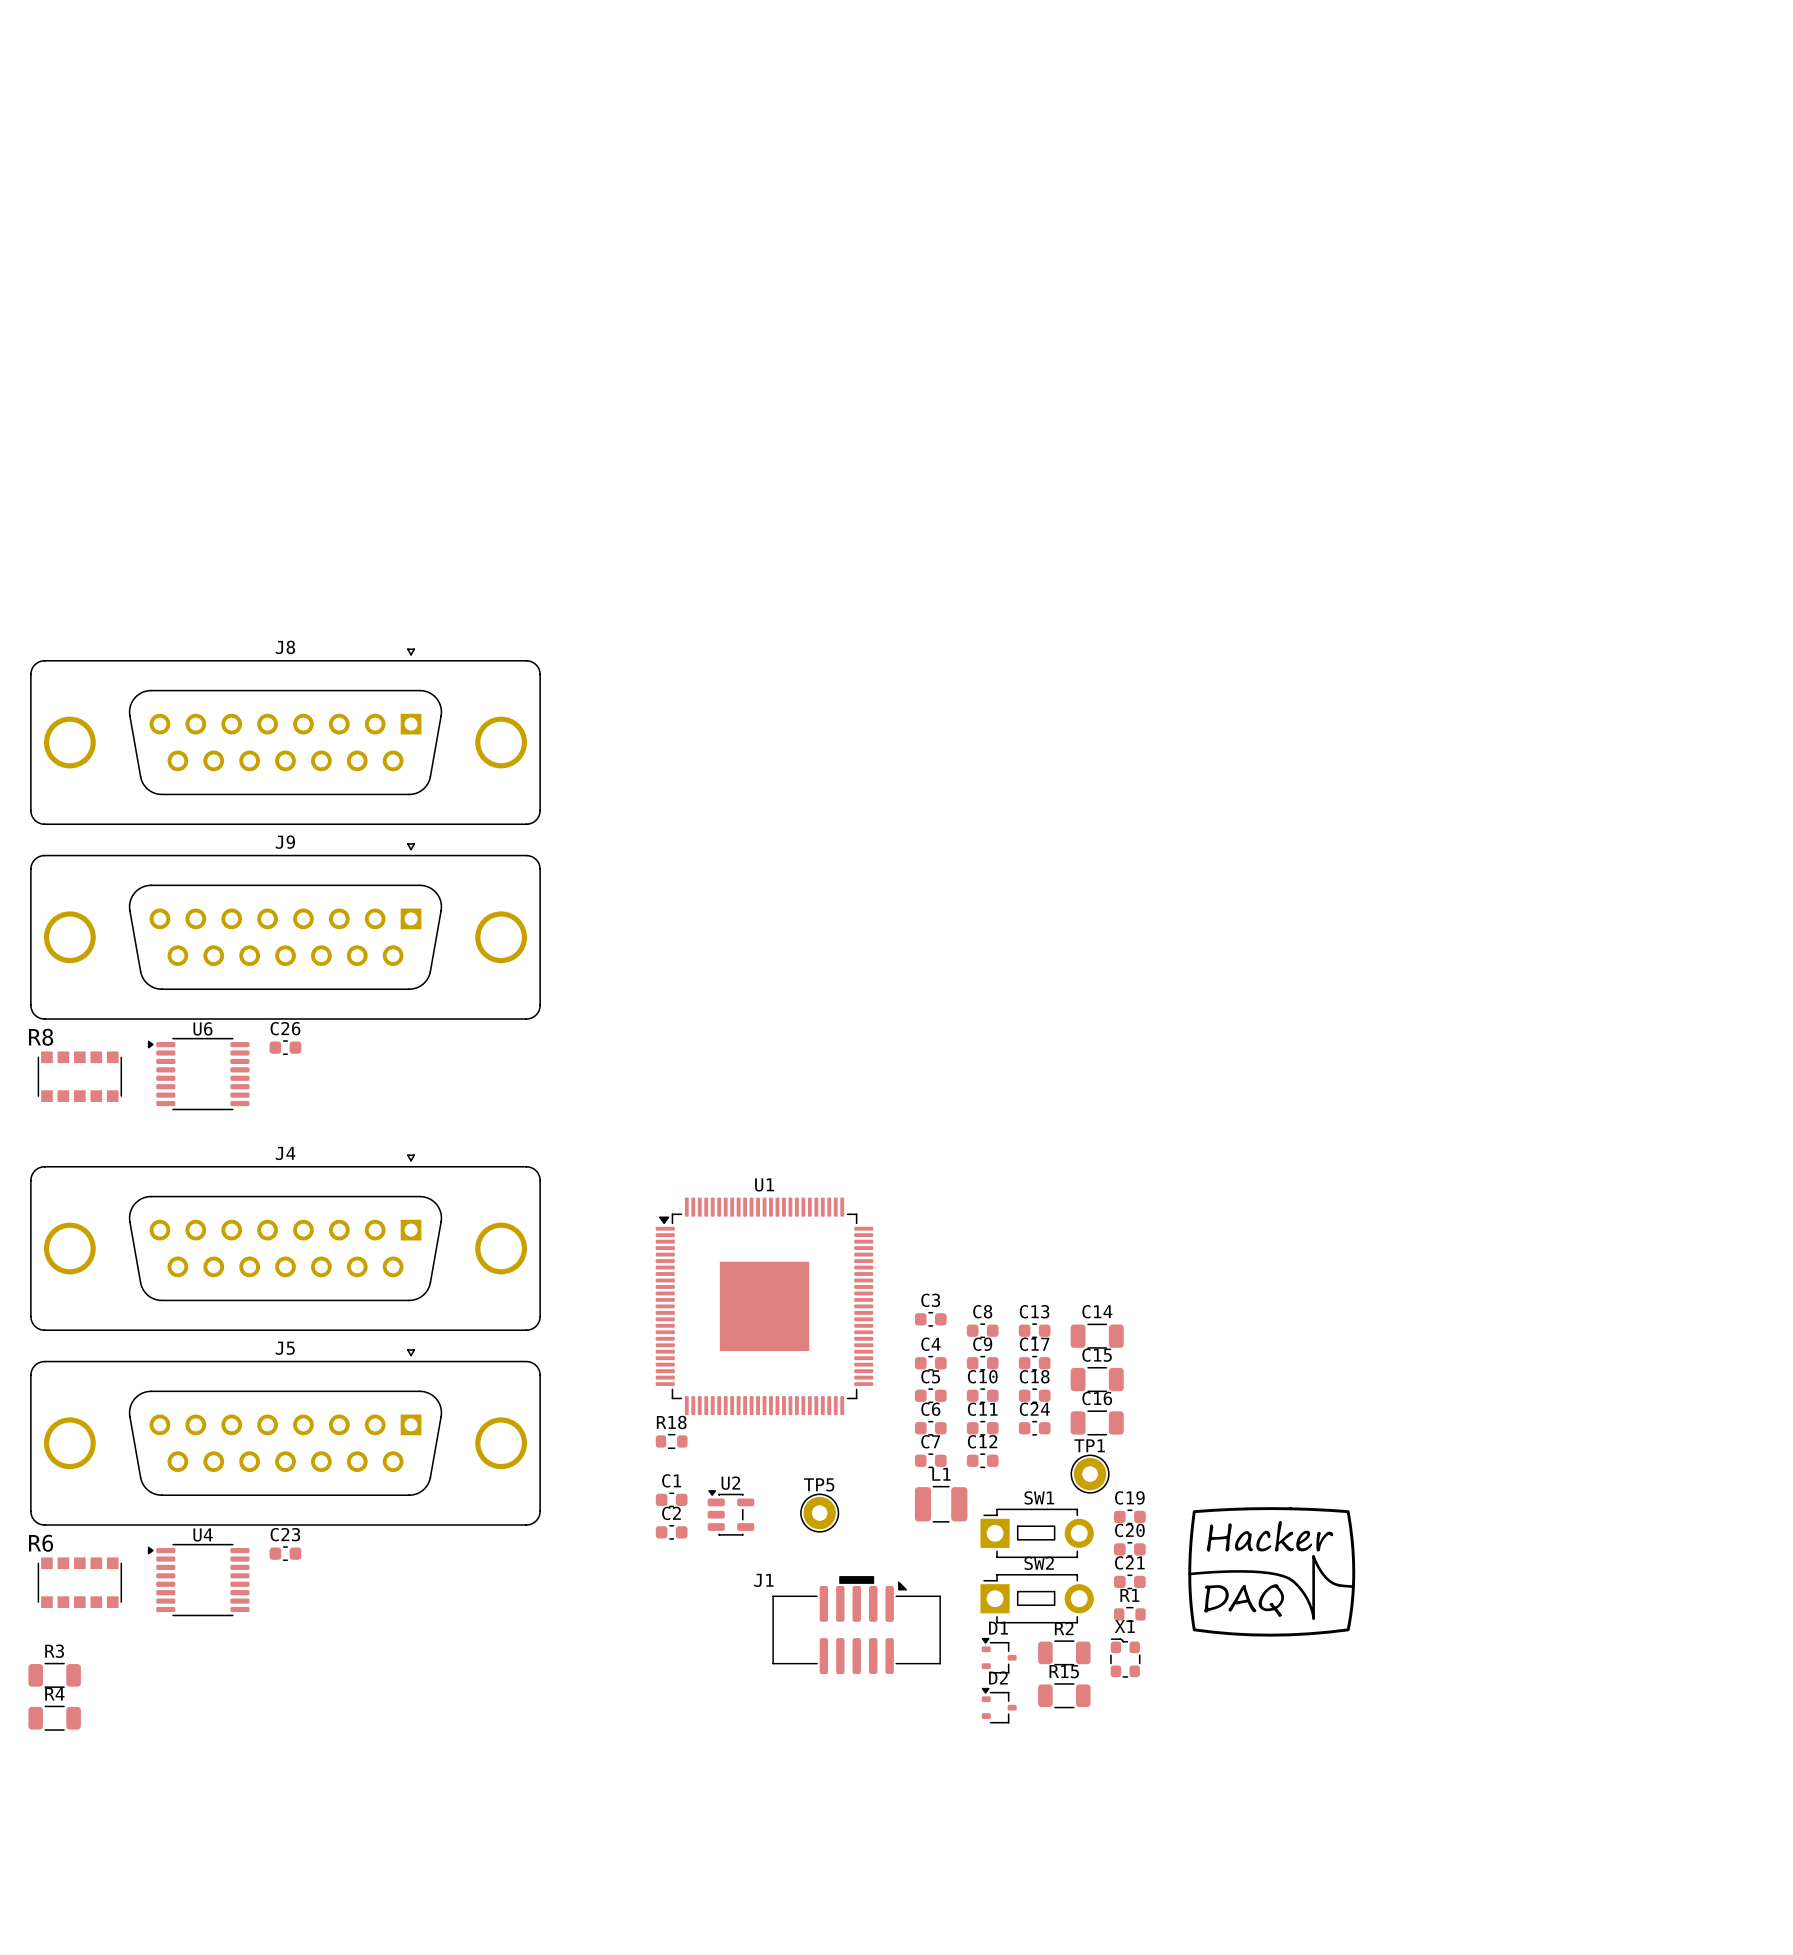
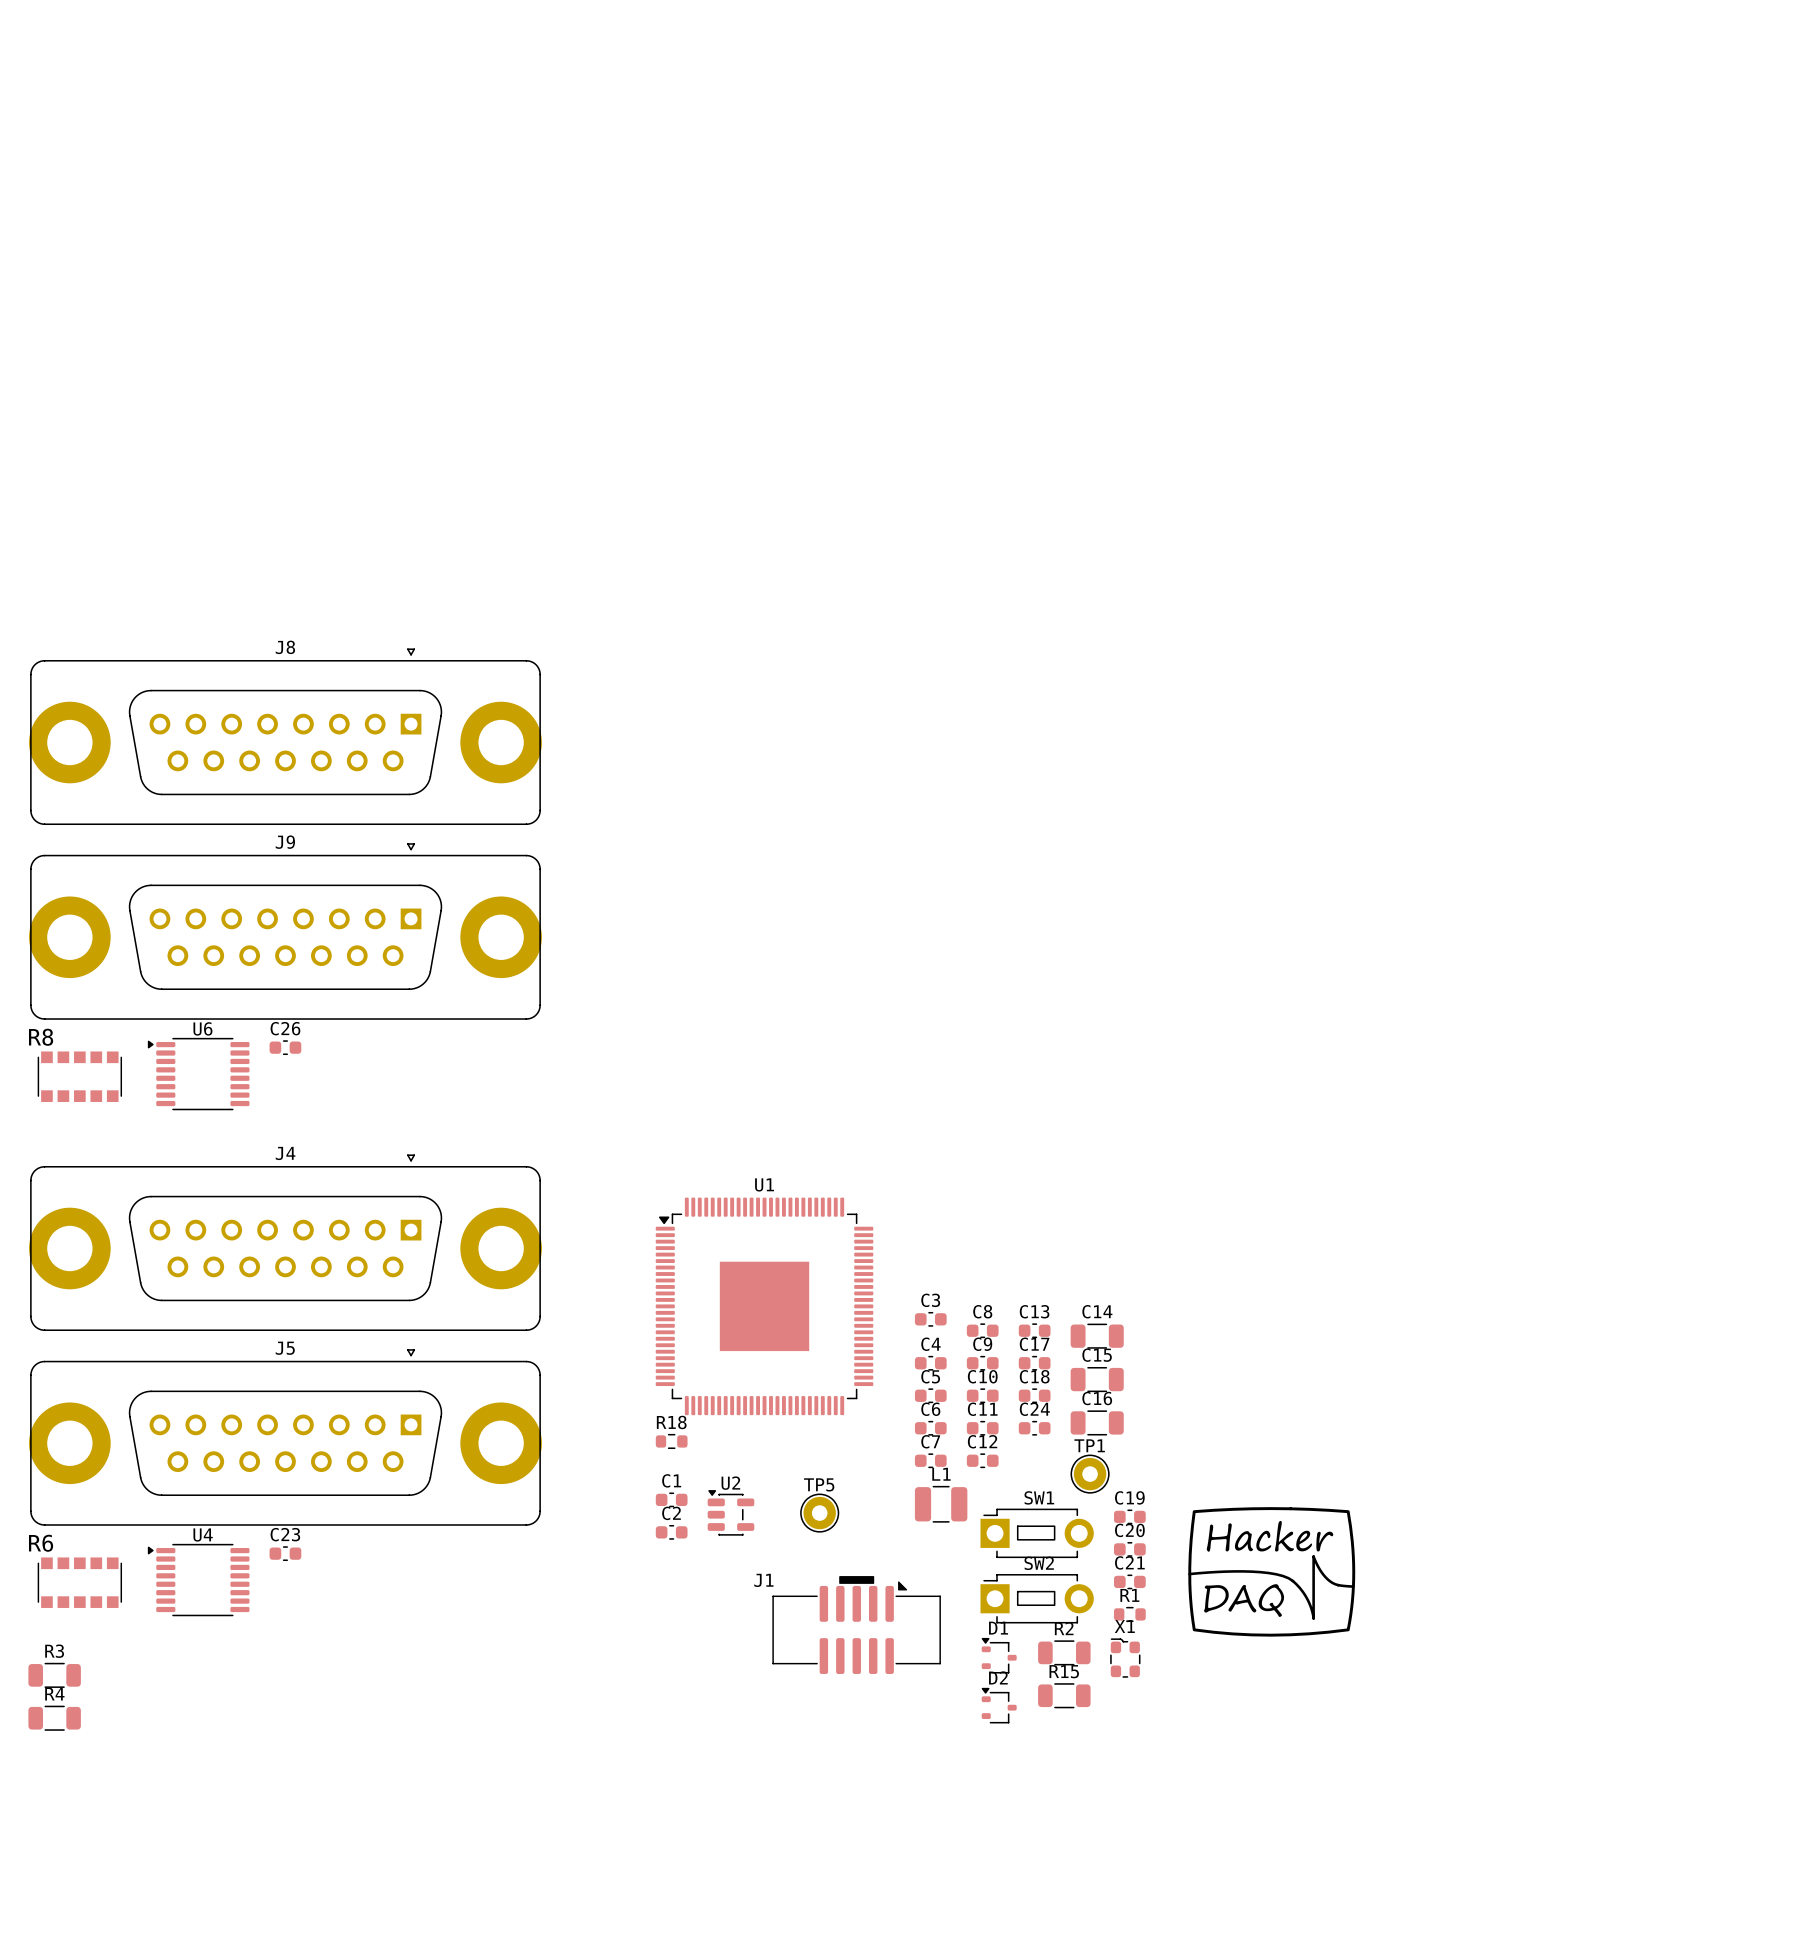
J8 footprint: [30, 648, 541, 826] -> [29, 648, 542, 826]
J9 footprint: [30, 843, 541, 1020] -> [29, 843, 542, 1020]
J4 footprint: [30, 1154, 541, 1332] -> [29, 1154, 542, 1332]
J5 footprint: [30, 1349, 541, 1526] -> [29, 1349, 542, 1526]

